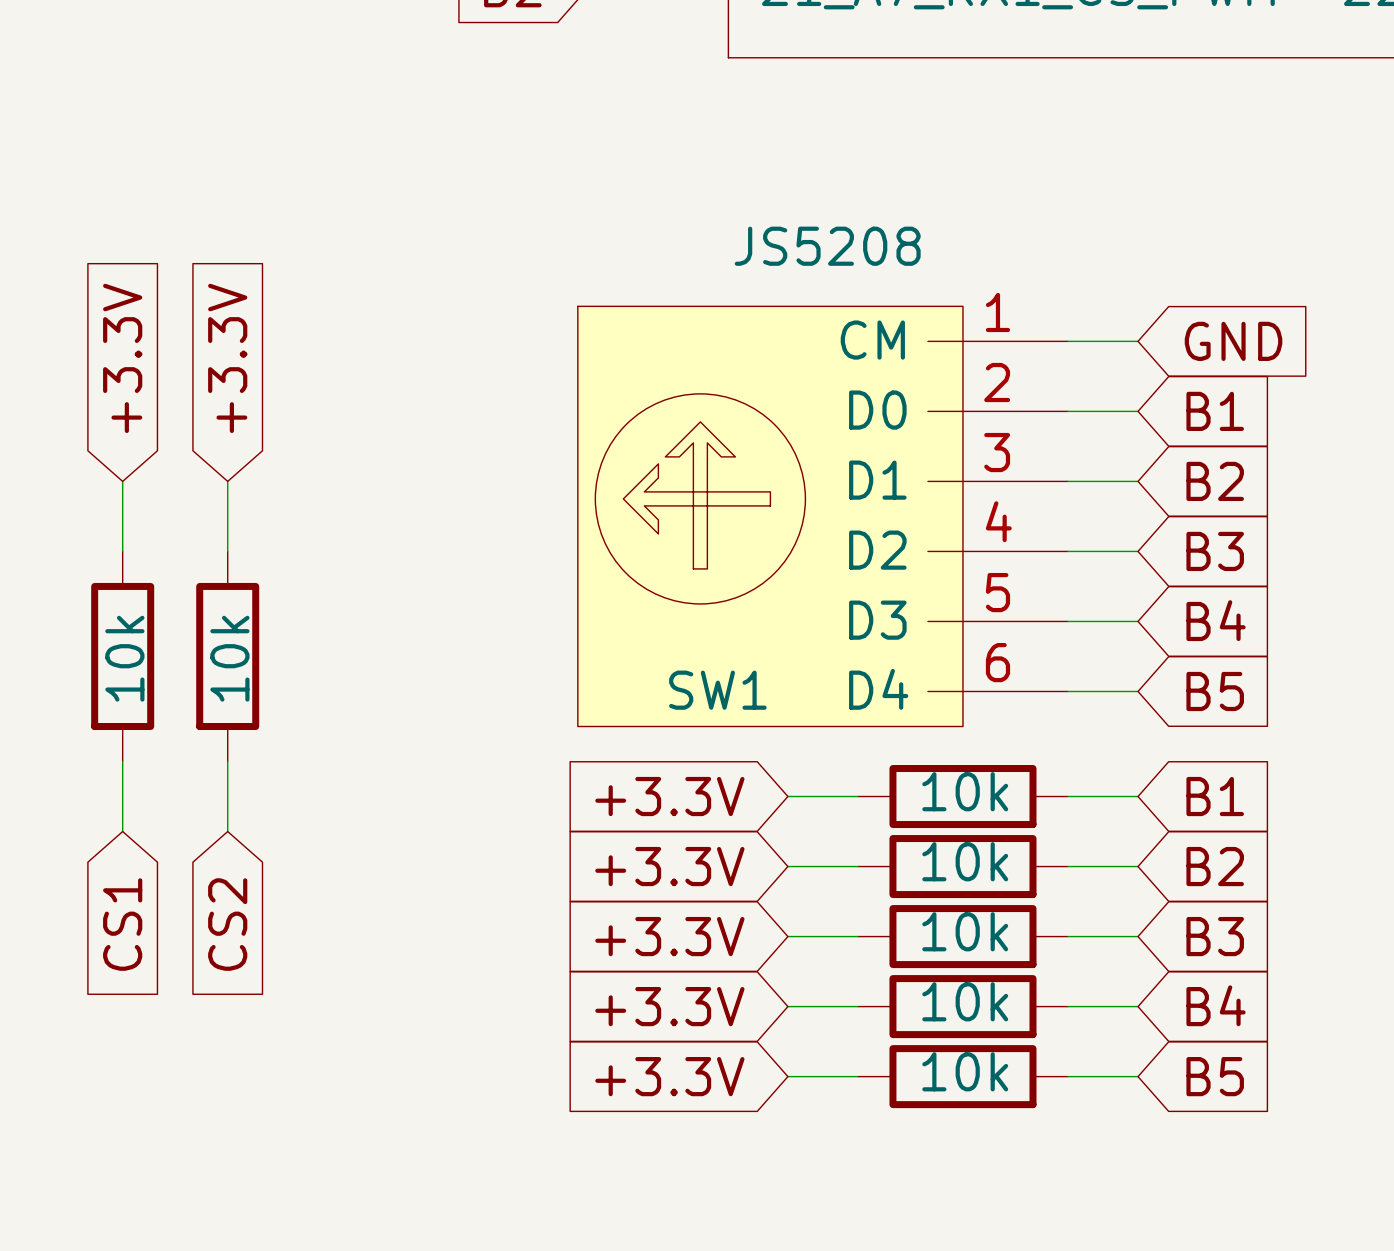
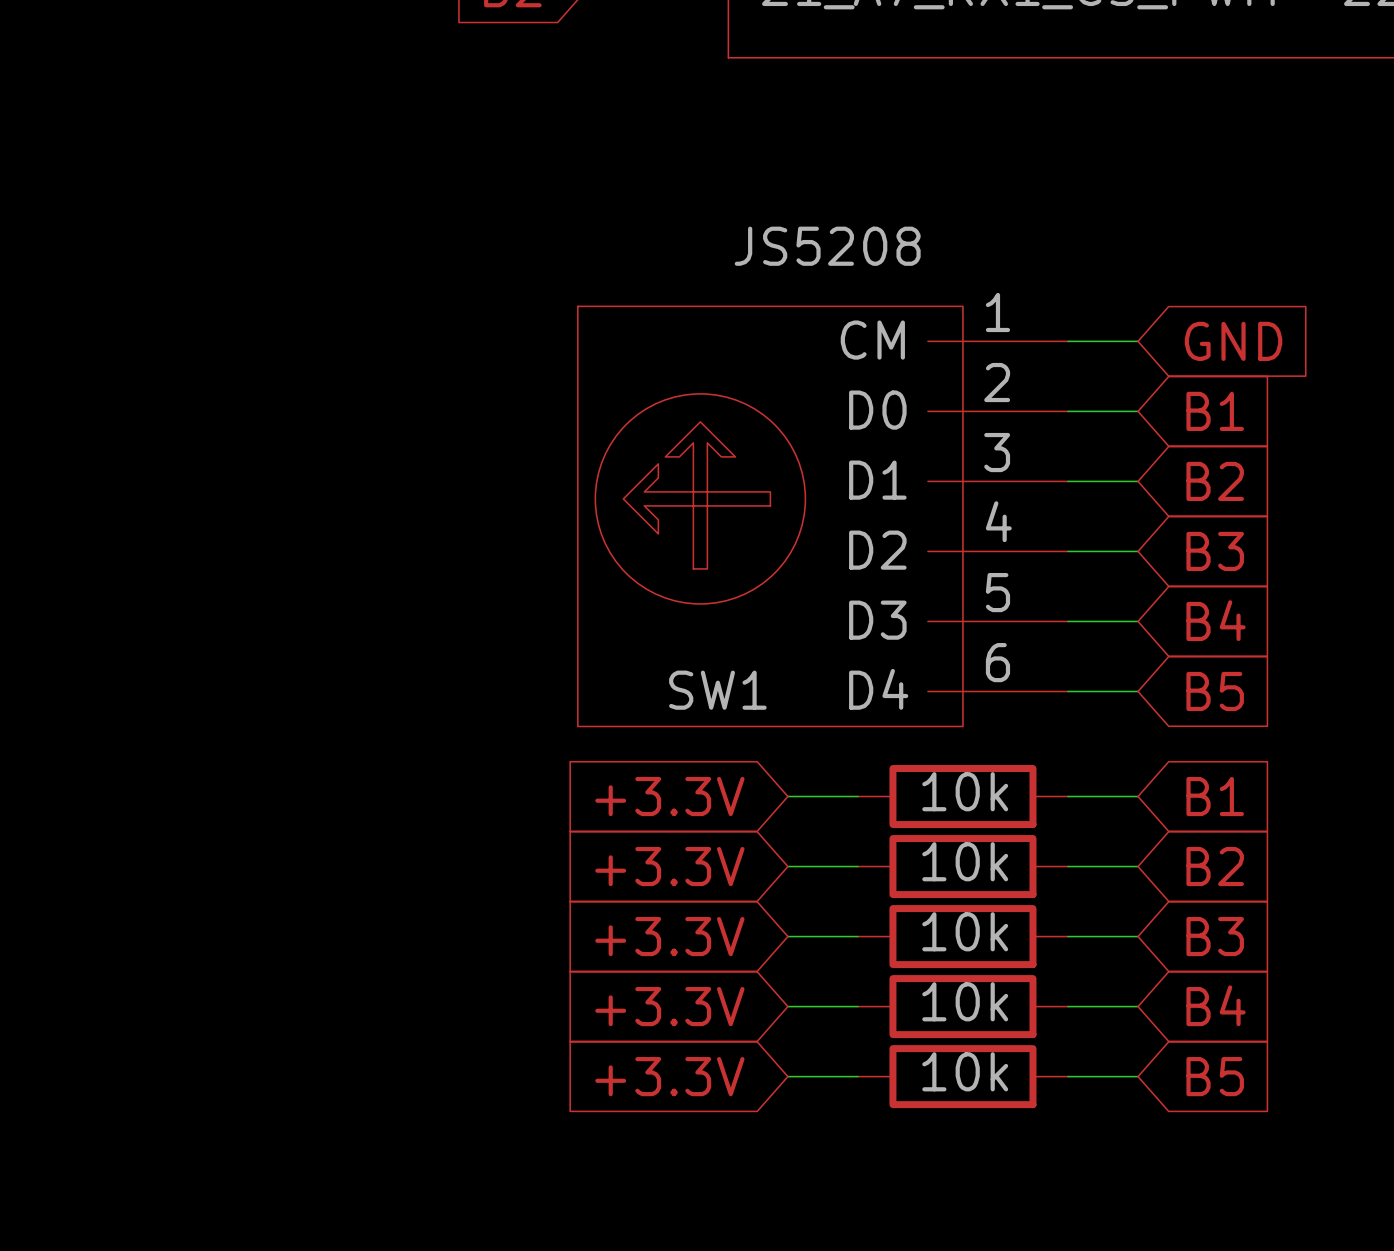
global label: +3.3V (122, 358) -> none
global label: +3.3V (227, 358) -> none
wire: (122, 481) (122, 551) -> none
wire: (227, 481) (227, 551) -> none
part: 10k (122, 656) -> none
part: 10k (227, 656) -> none
wire: (122, 761) (122, 831) -> none
wire: (227, 761) (227, 831) -> none
global label: CS1 (122, 924) -> none
global label: CS2 (227, 924) -> none

